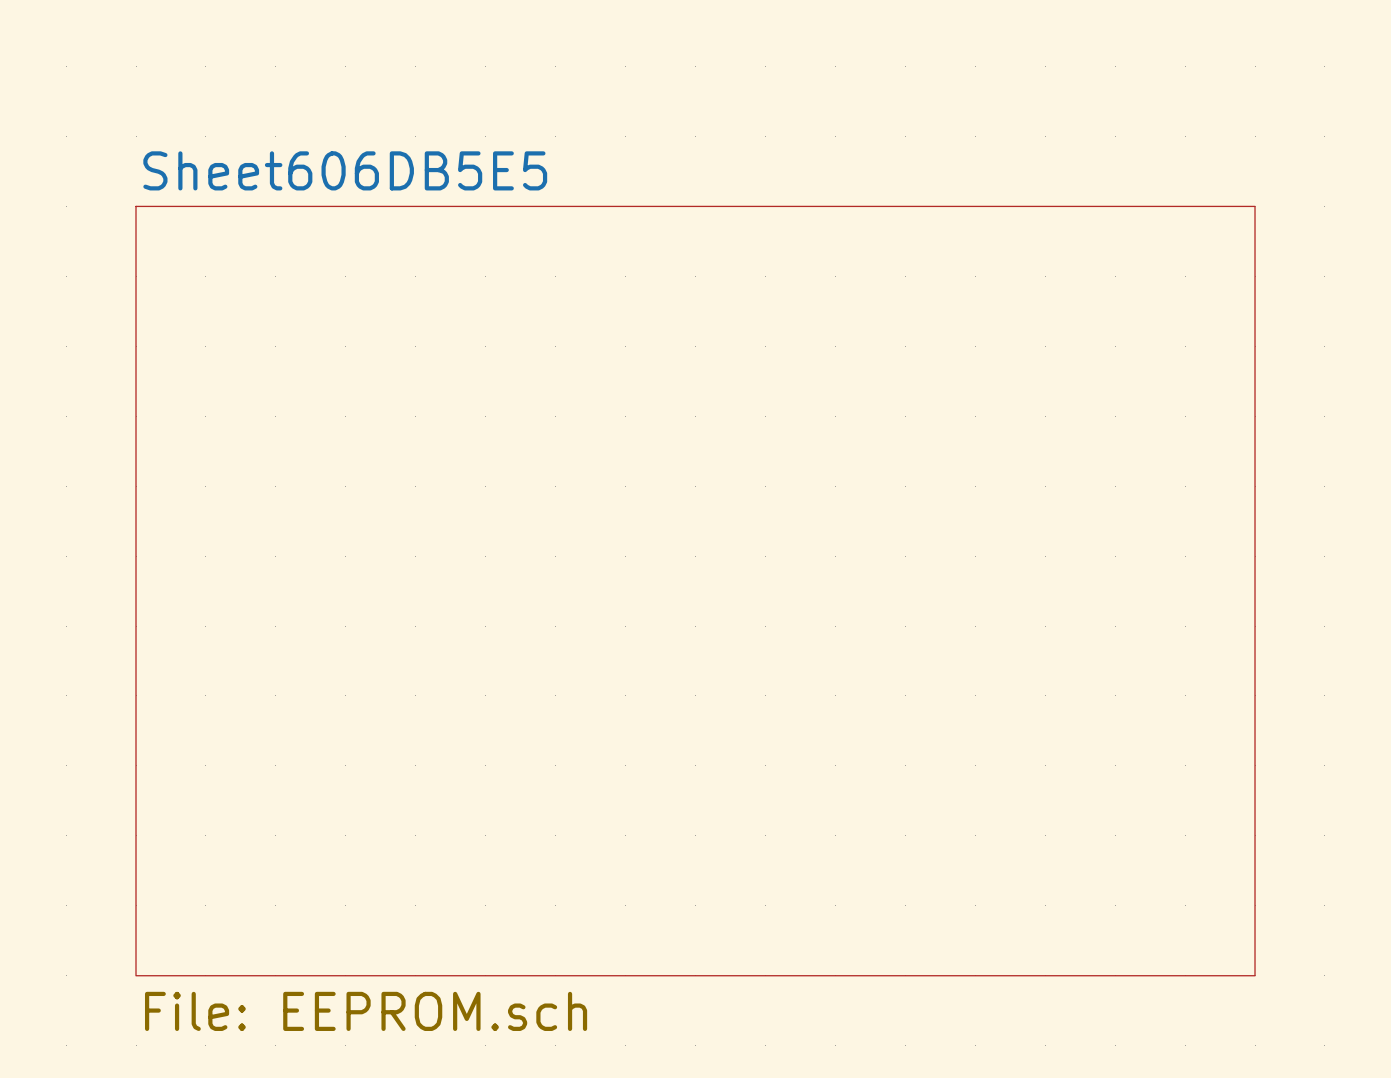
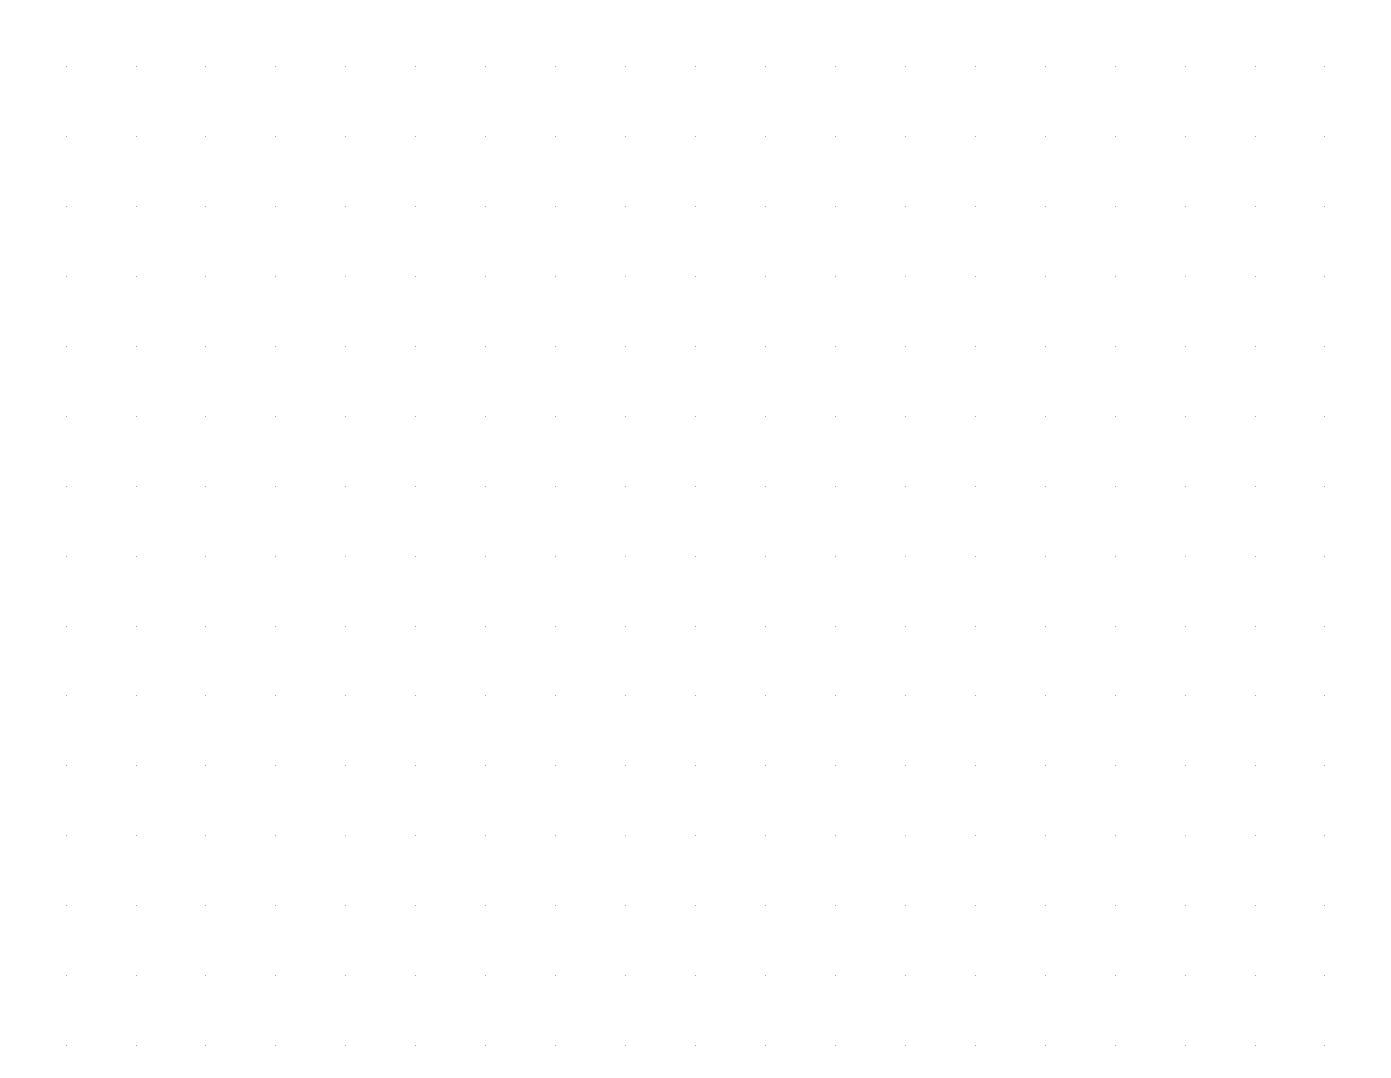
sheet Sheet606DB5E5: File: EEPROM.sch (695, 591) -> none

